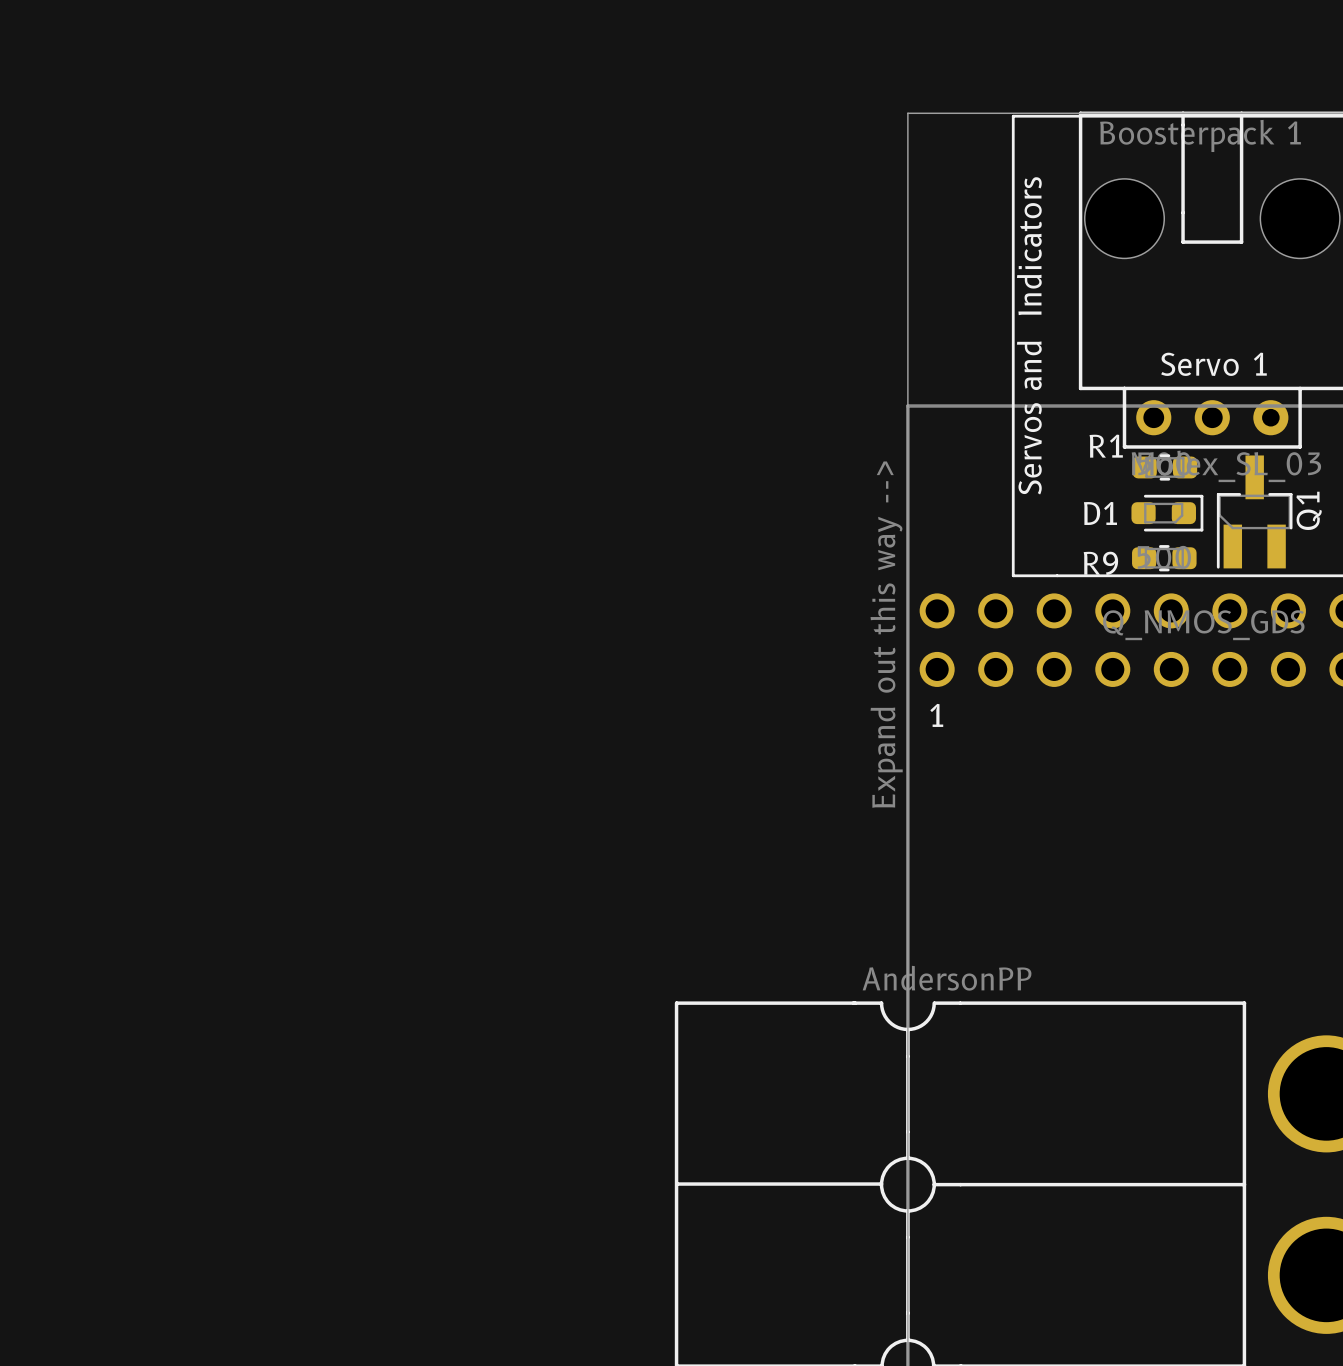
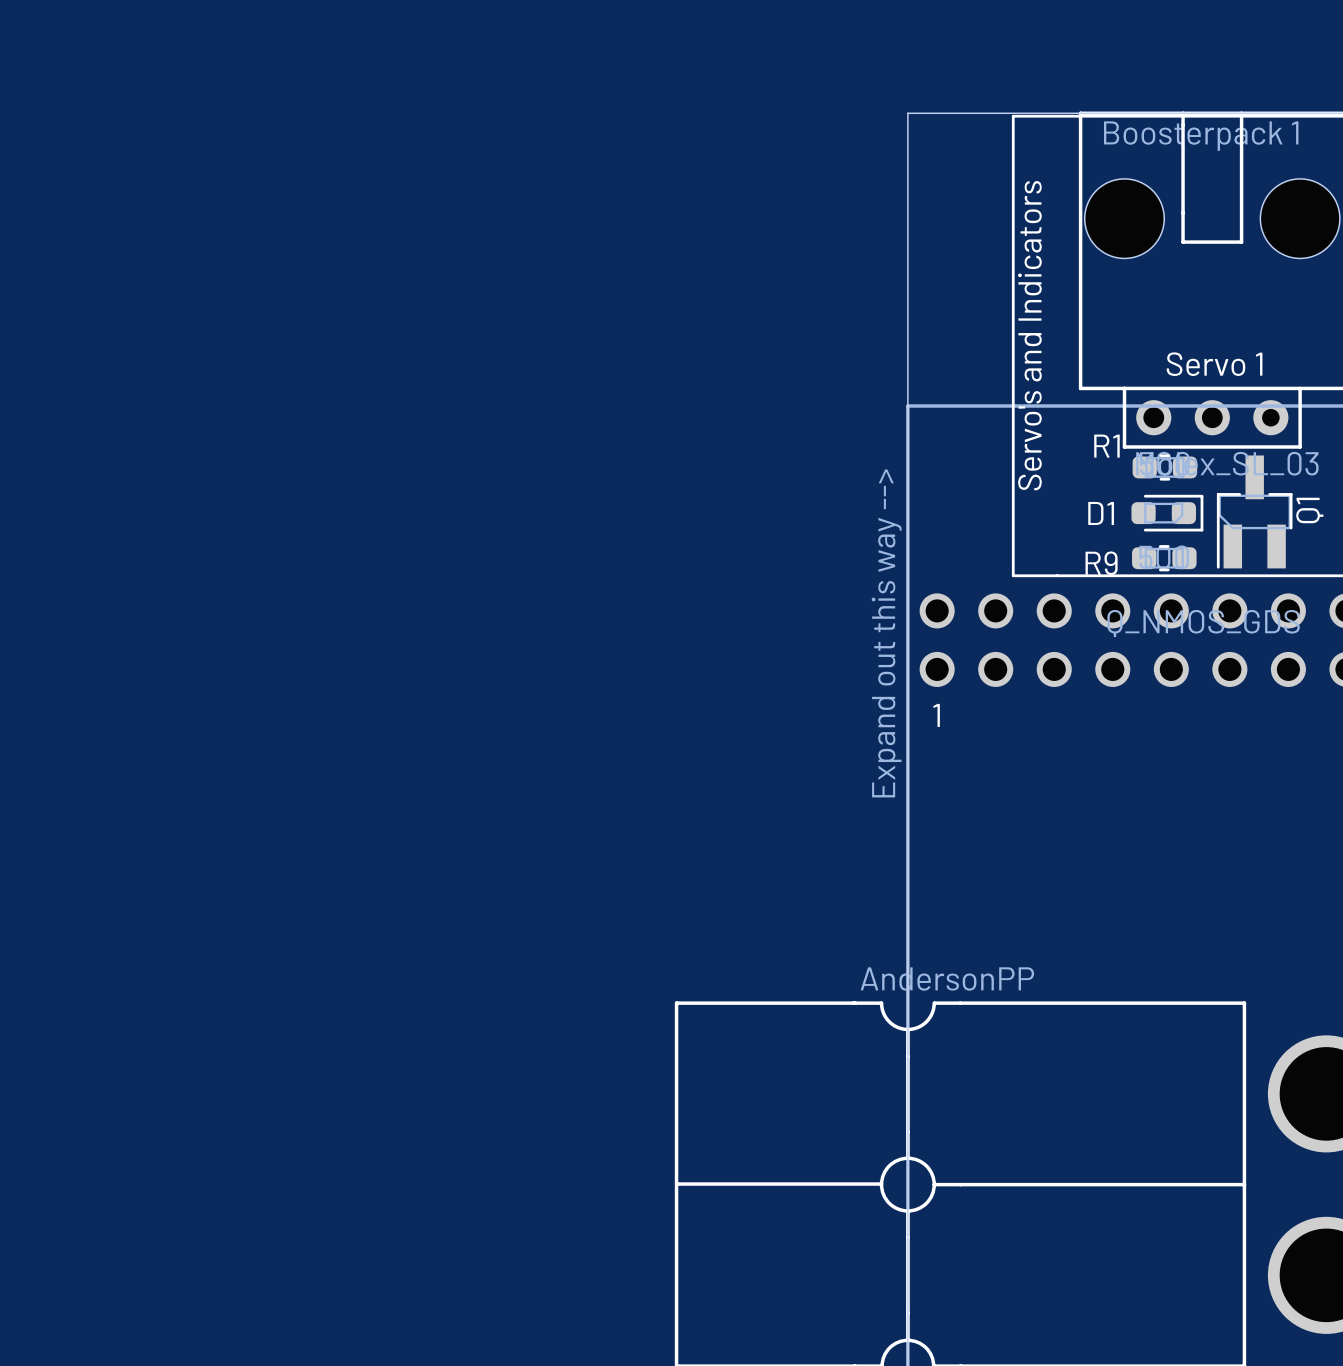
text: Servos and Indicators (1029, 335) -> Servo's and Indicators (1029, 335)

